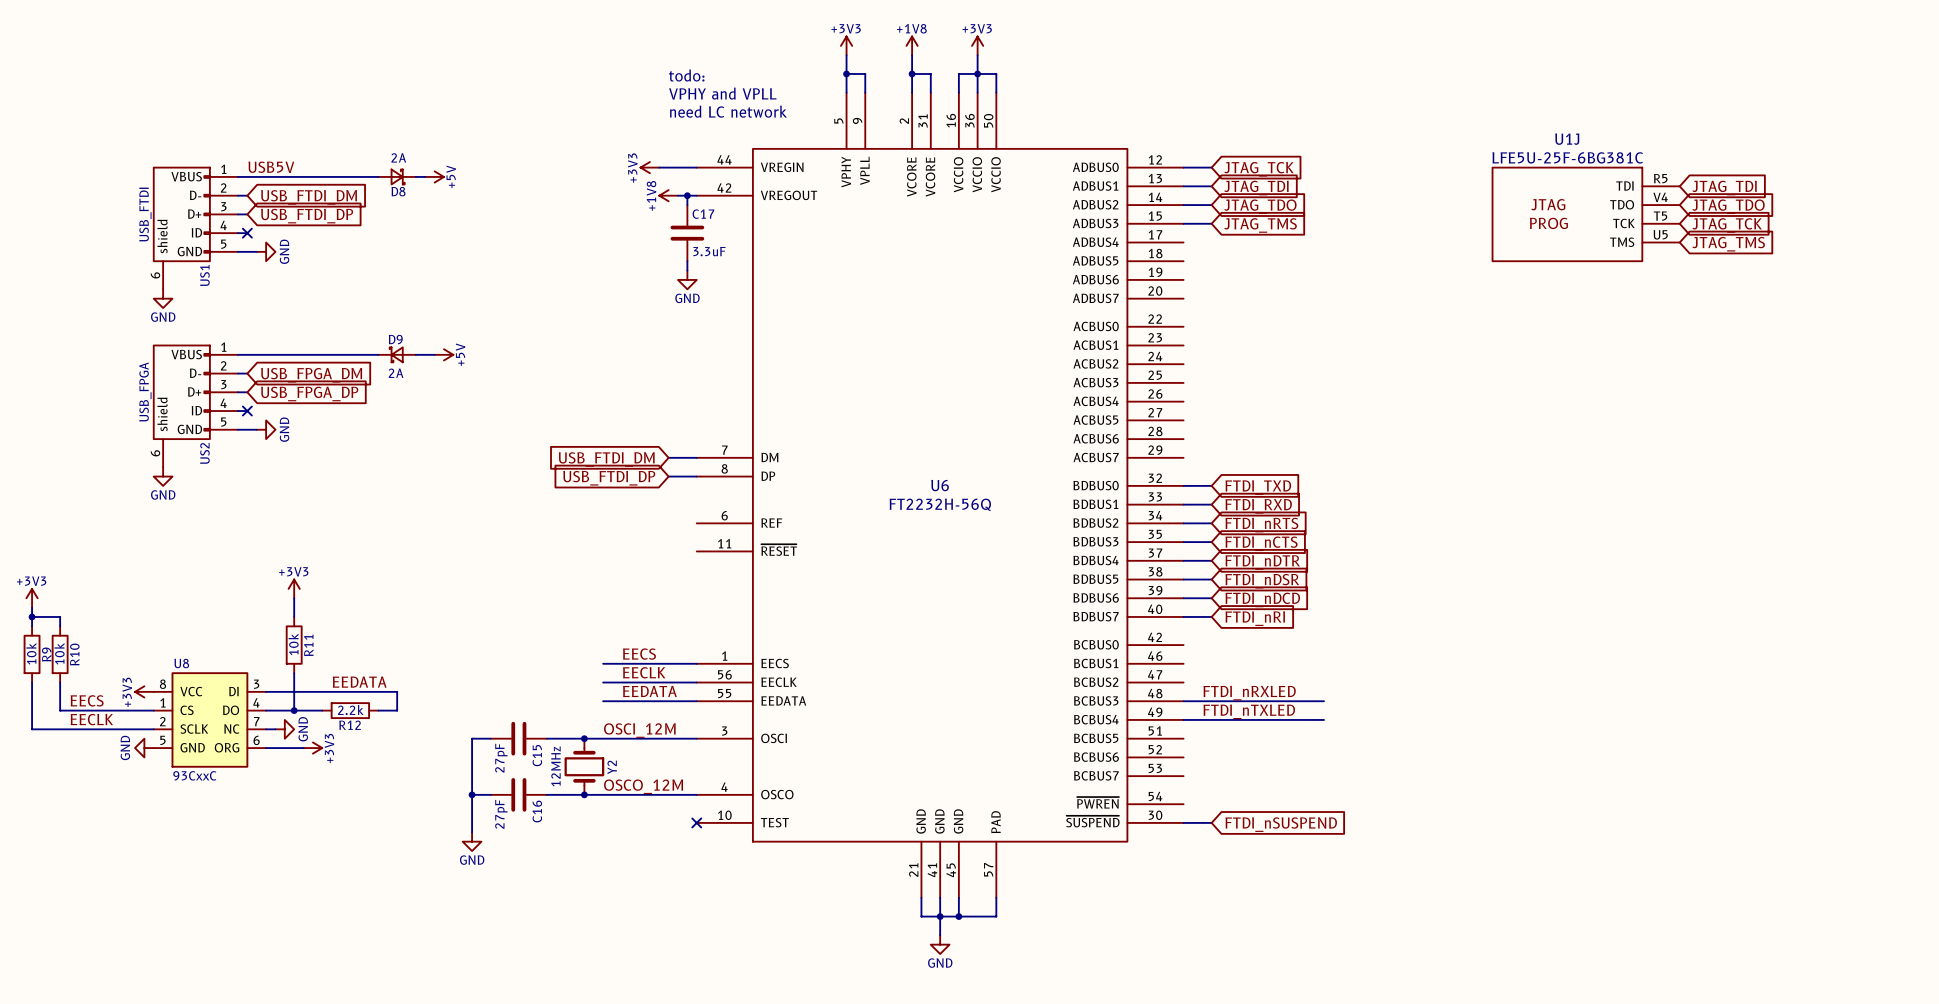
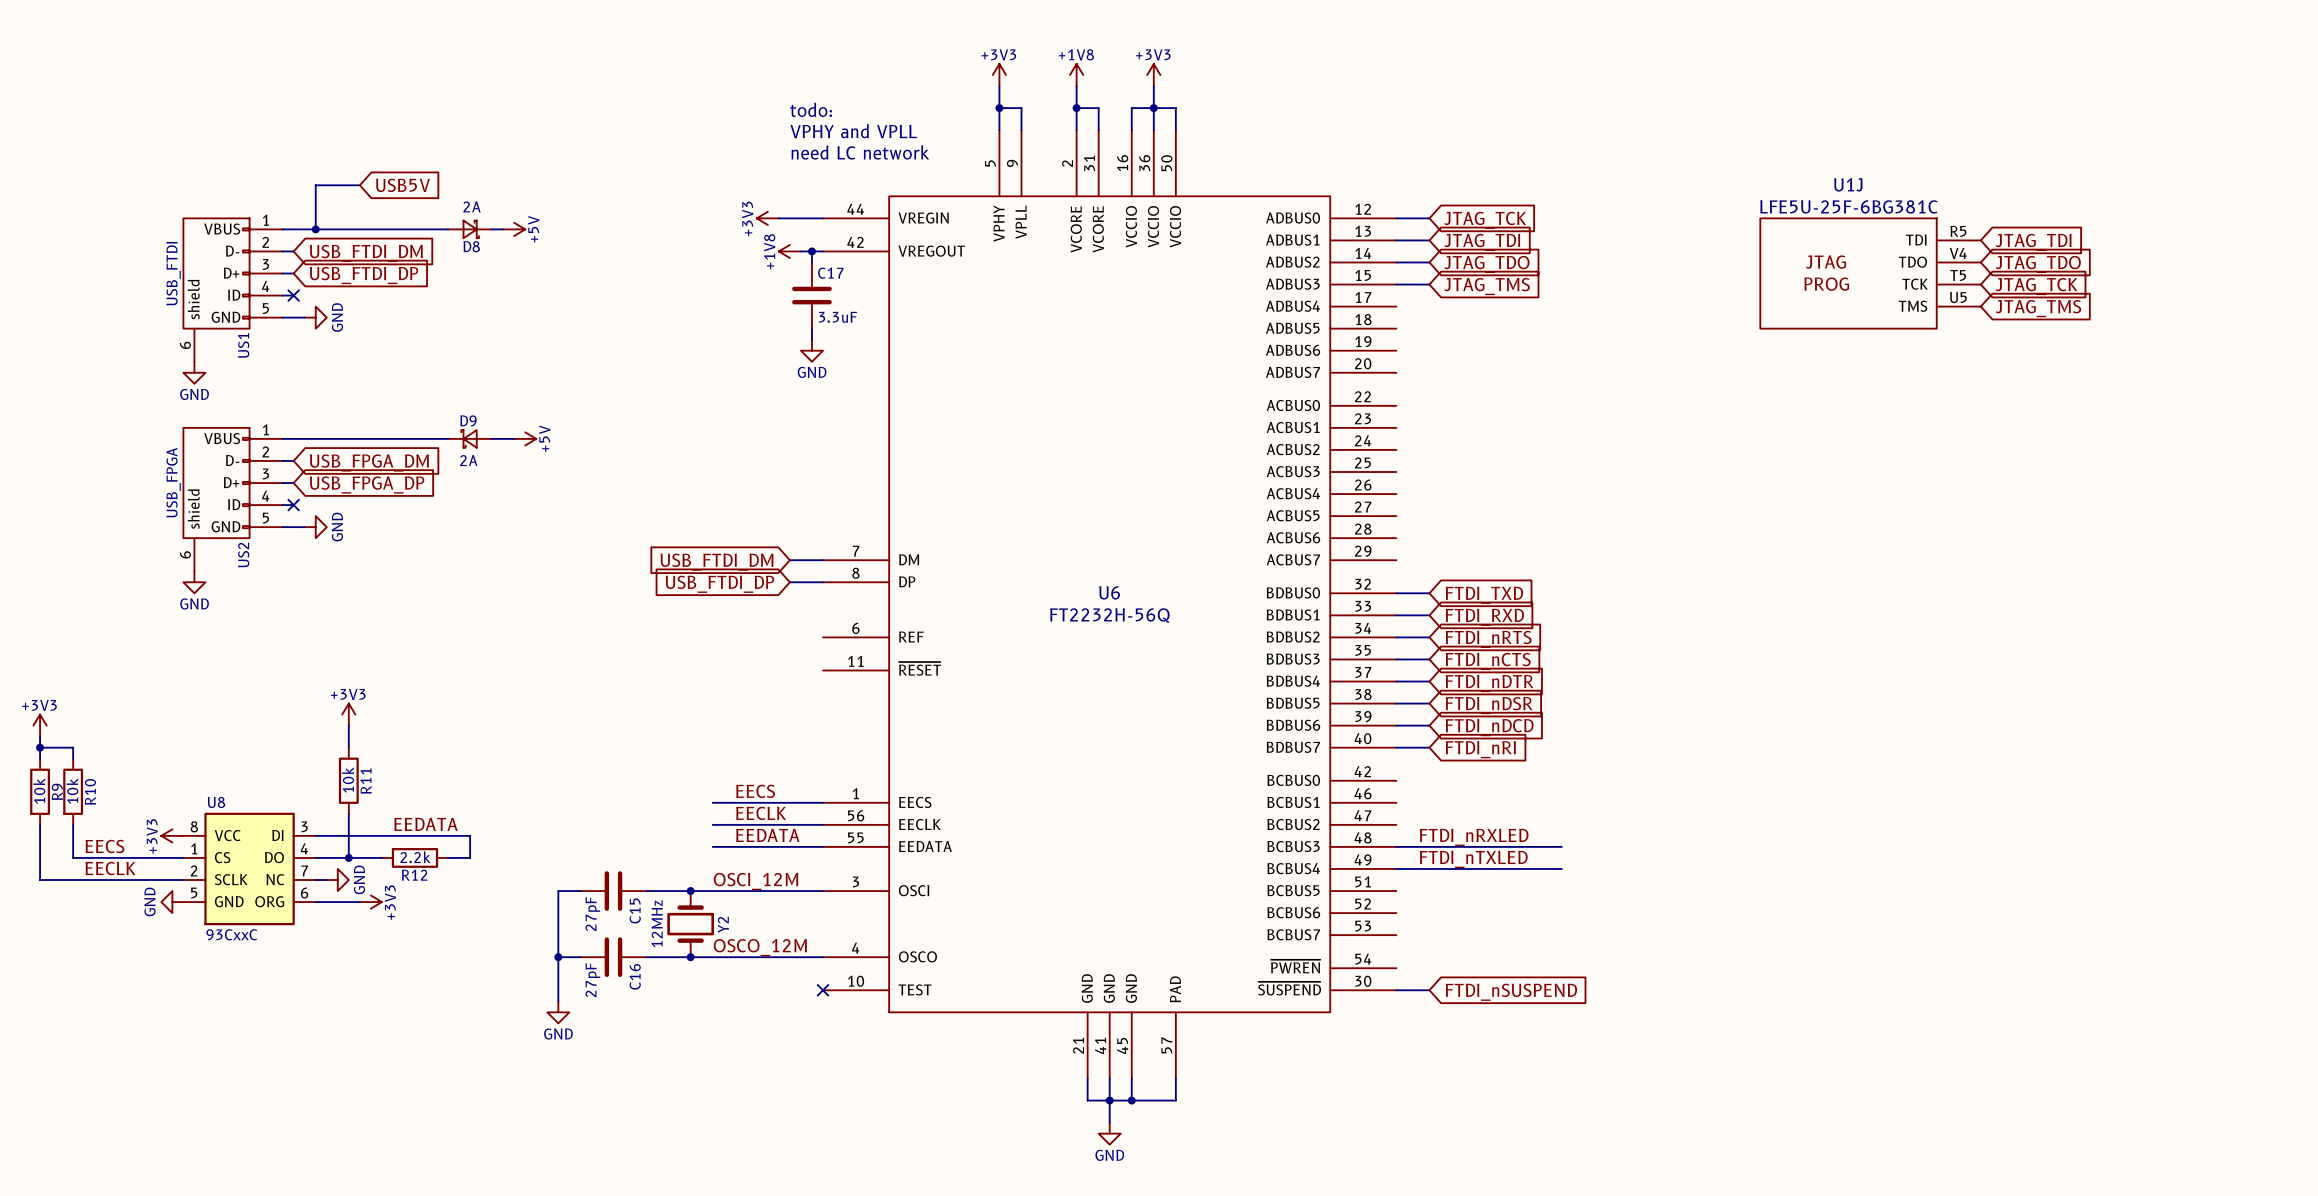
wire: none -> (359, 185) (315, 185) (315, 229)
global label: none -> USB5V (402, 185)
label: USB5V (271, 167) -> none
junction: none -> (315, 229)

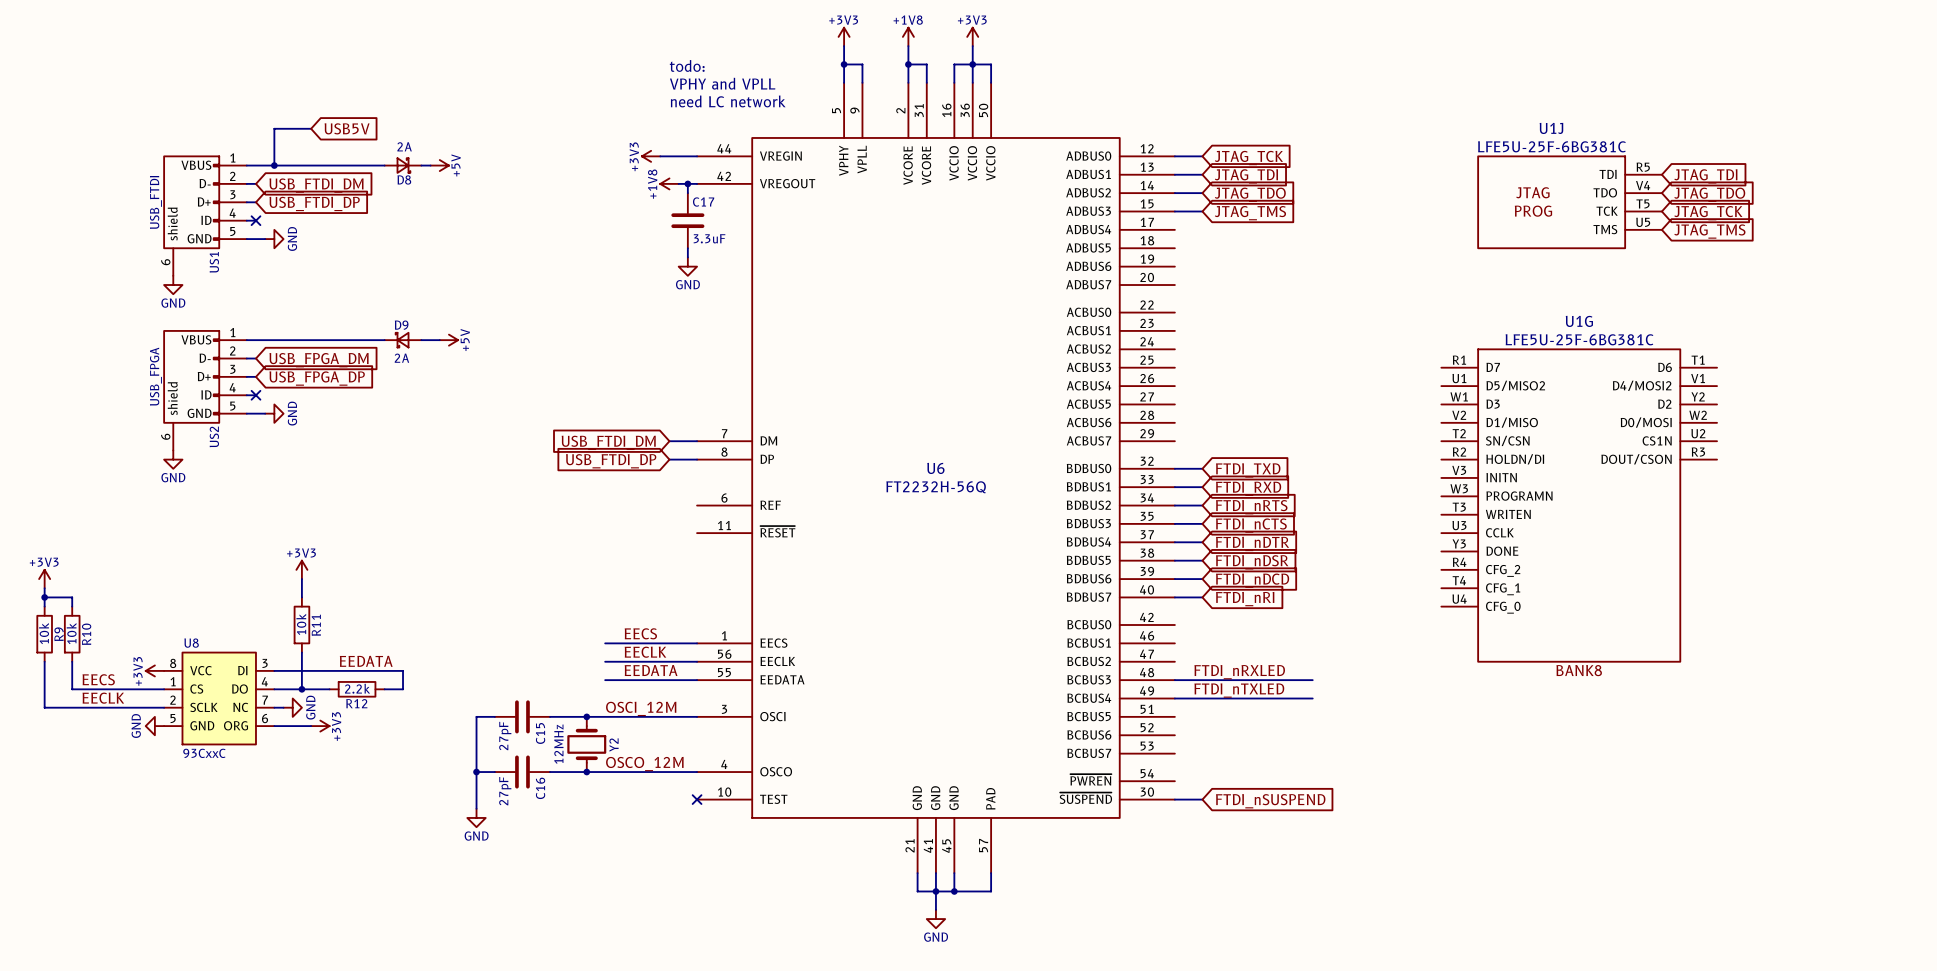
U1G: none -> LFE5U-25F-6BG381C (1579, 505)

